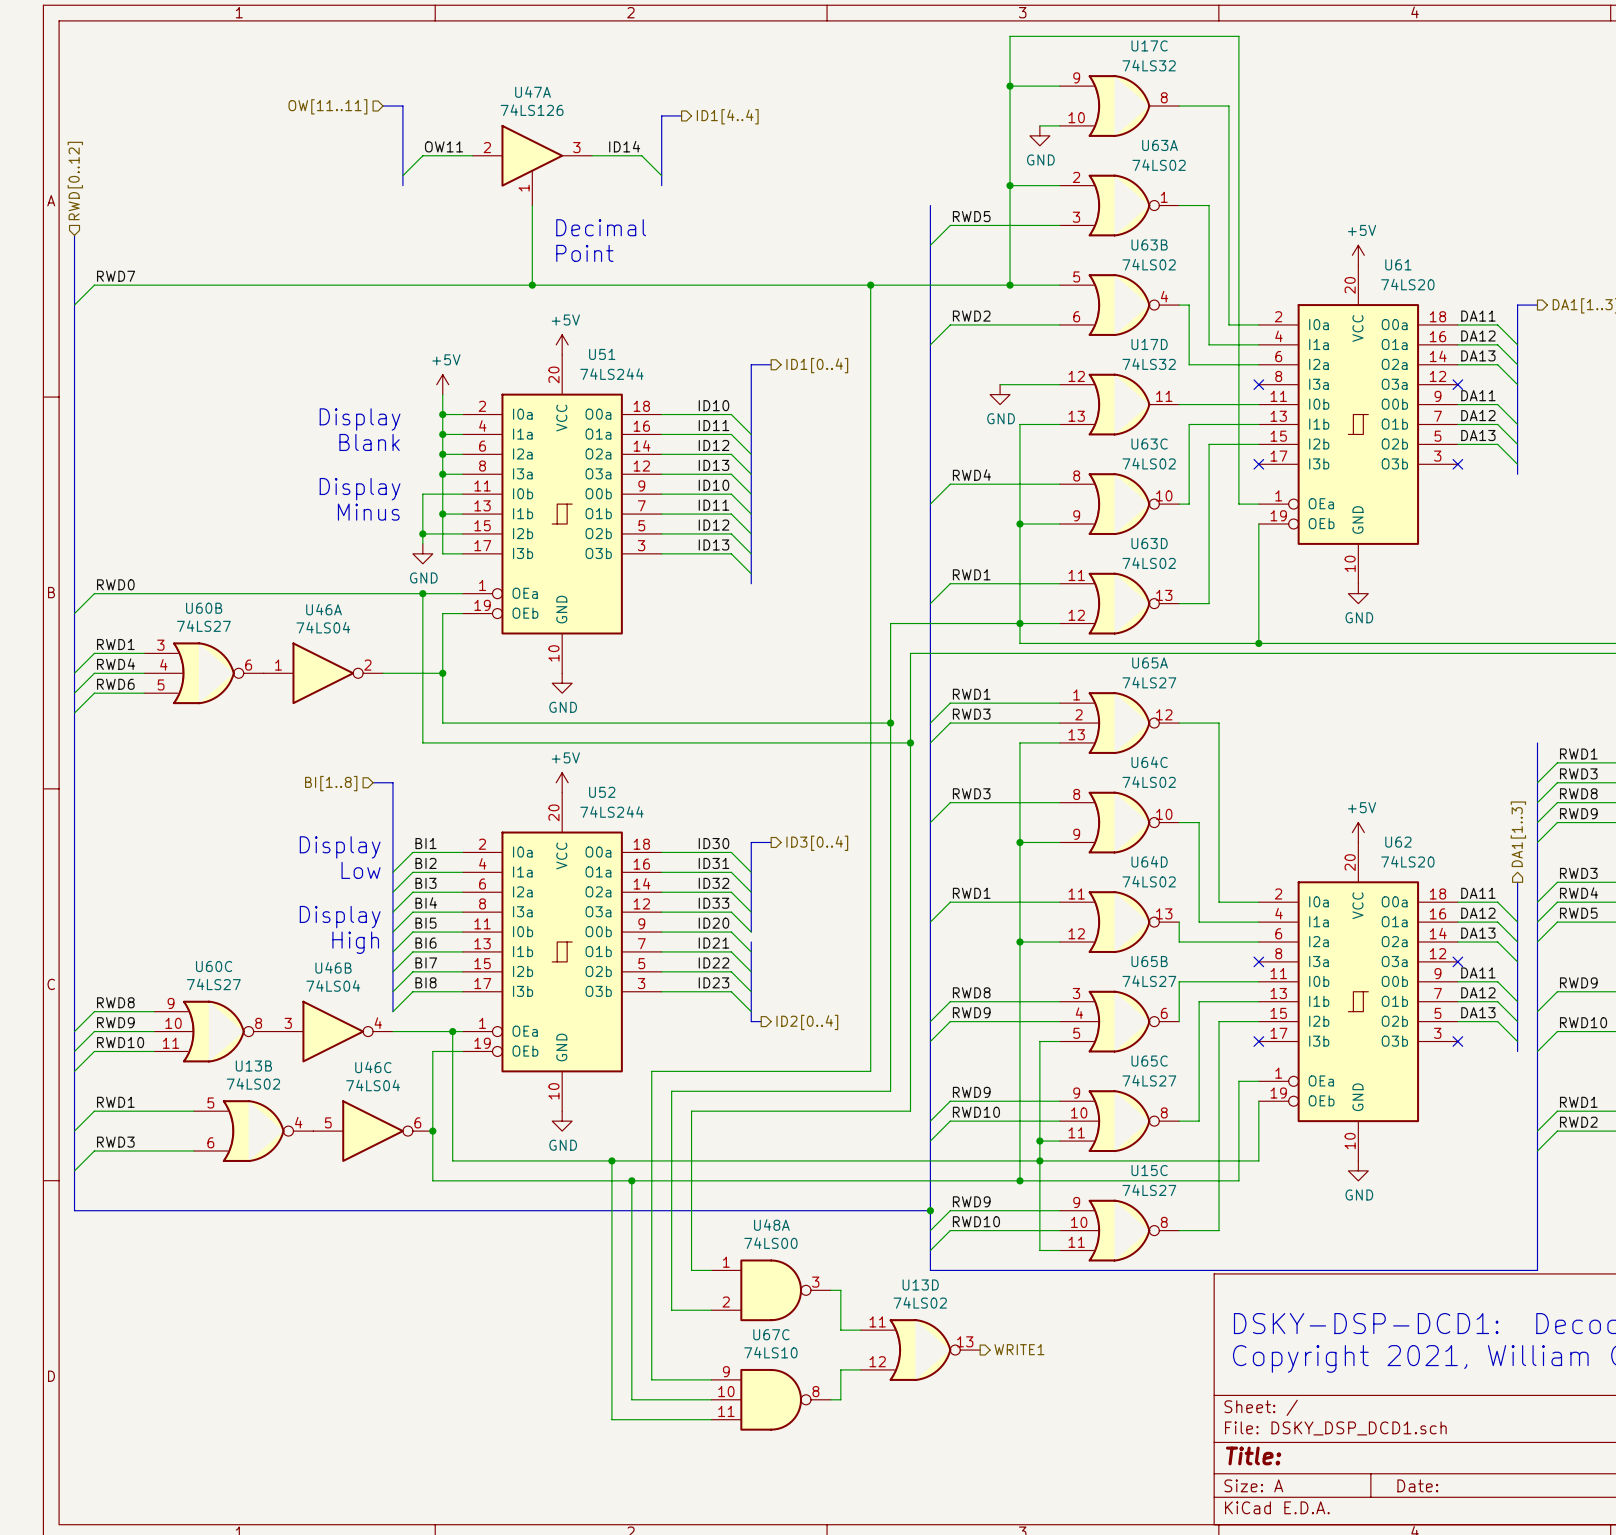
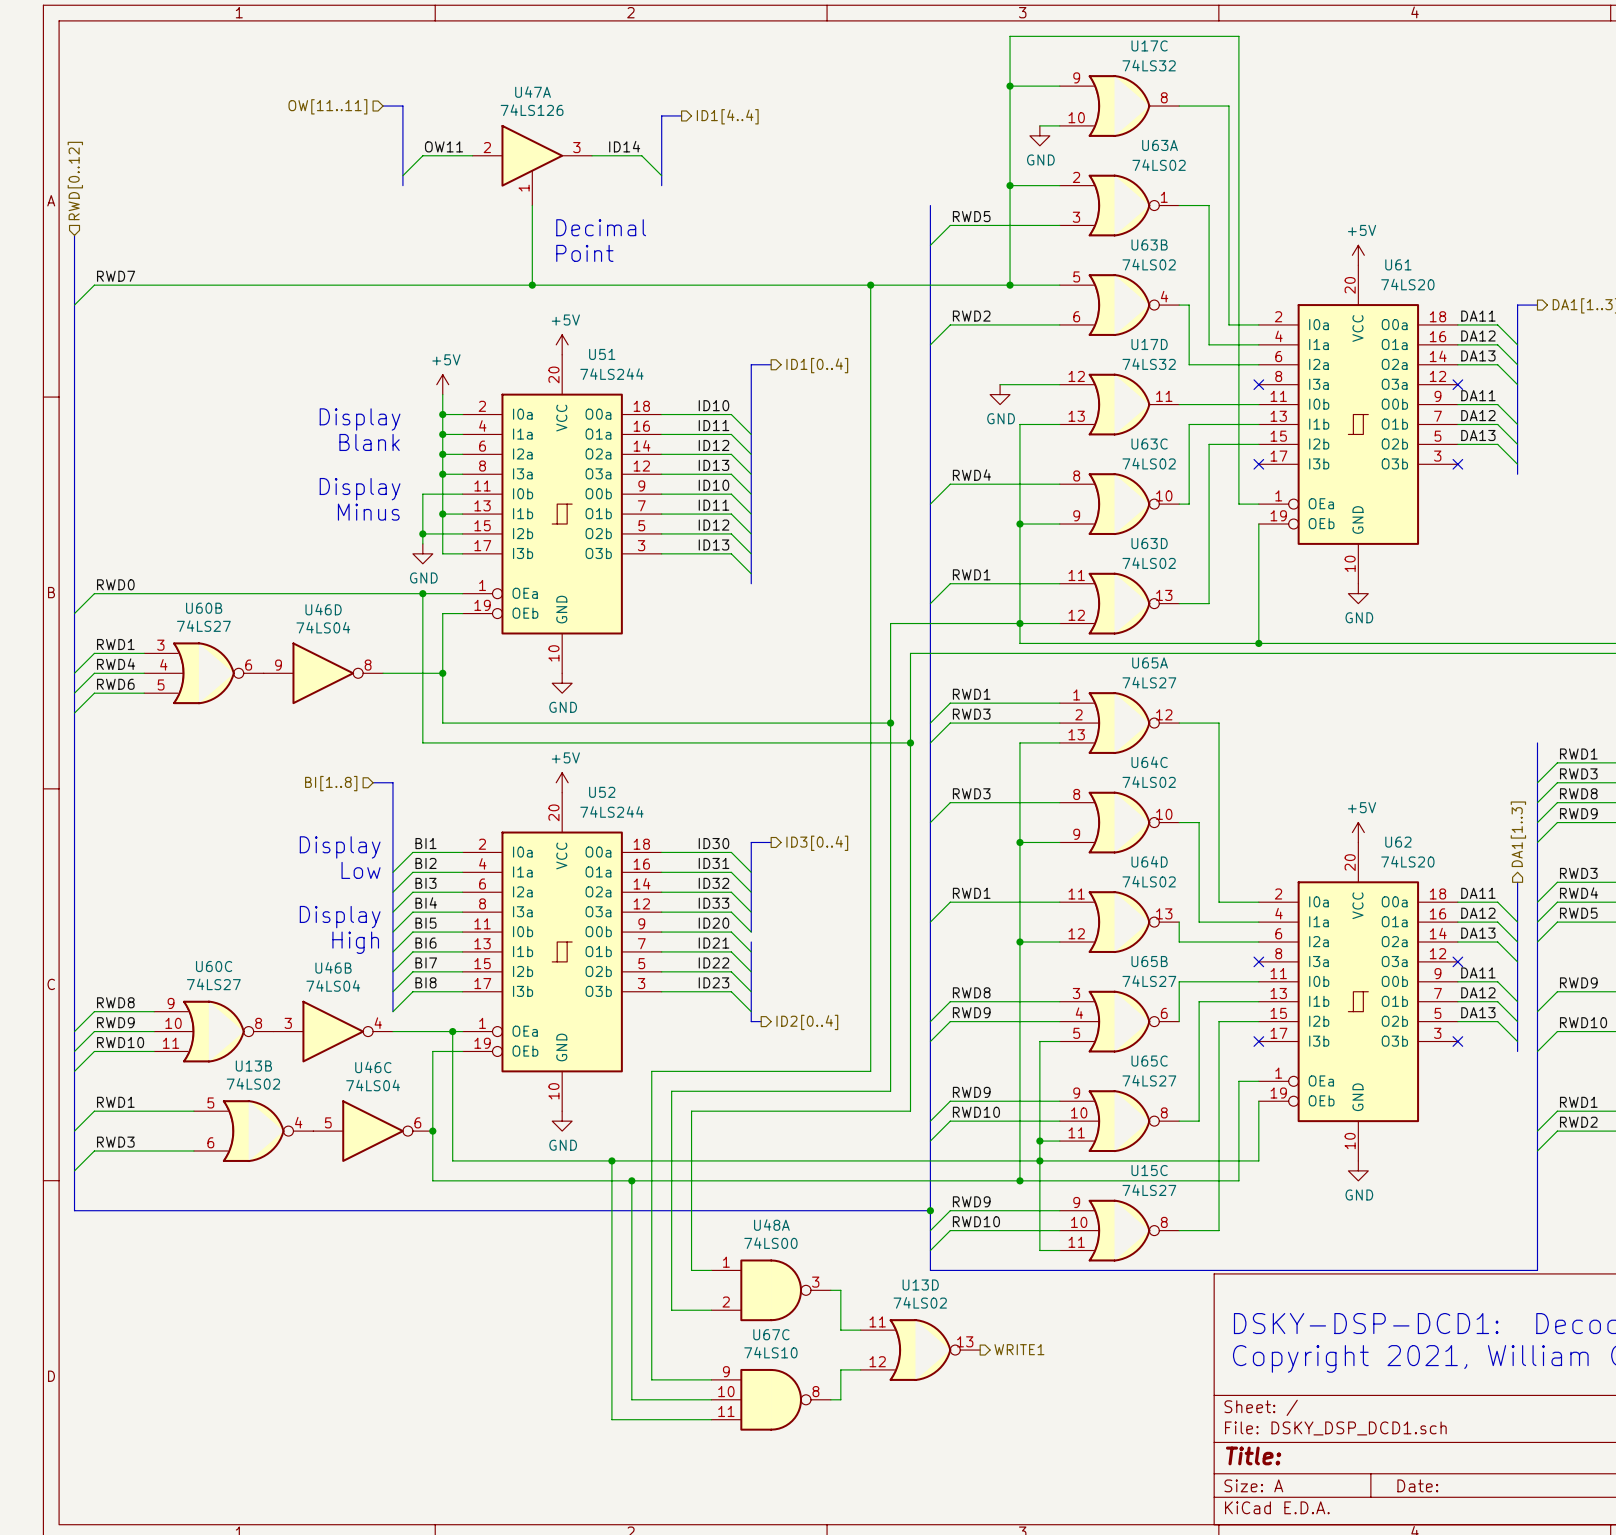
U46A name: U46A (324, 609) -> U46D (323, 609)
U46A pin number: 1 (278, 665) -> 9 (278, 665)
U46A pin number: 2 (367, 665) -> 8 (368, 665)

